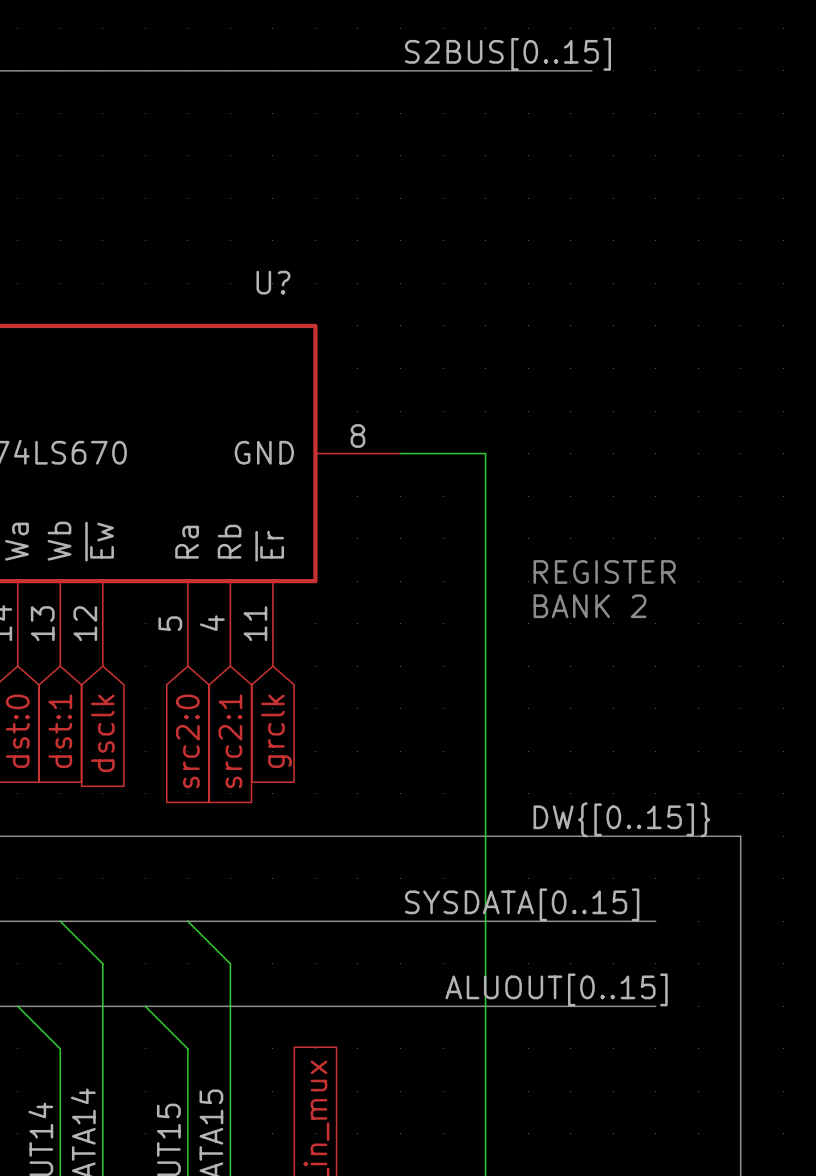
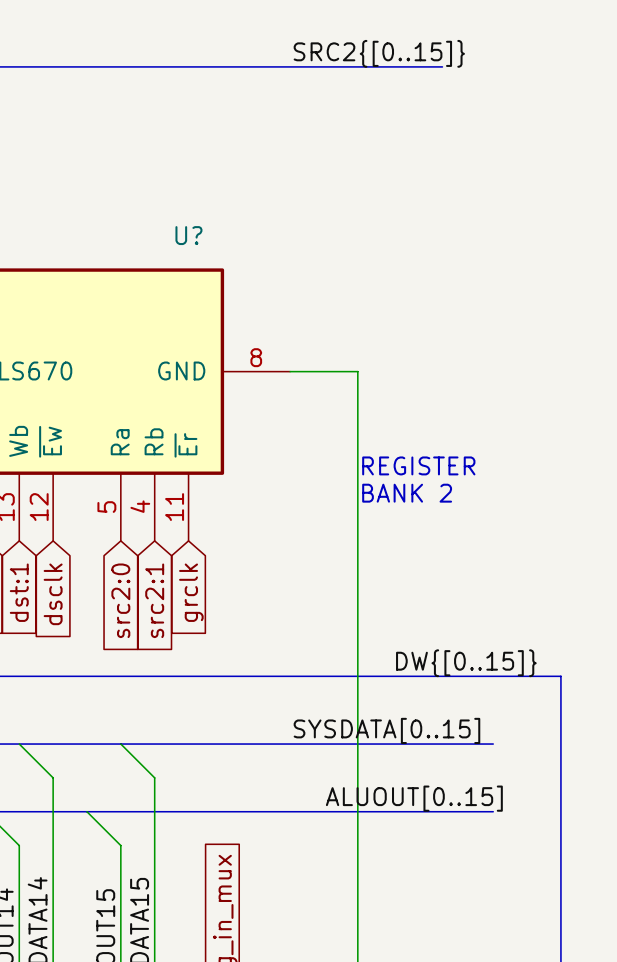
label: S2BUS[0..15] (507, 54) -> SRC2{[0..15]} (379, 53)
text position: REGISTER (604, 571) -> REGISTER (418, 465)
text position: BANK 2 (589, 606) -> BANK 2 (407, 493)

